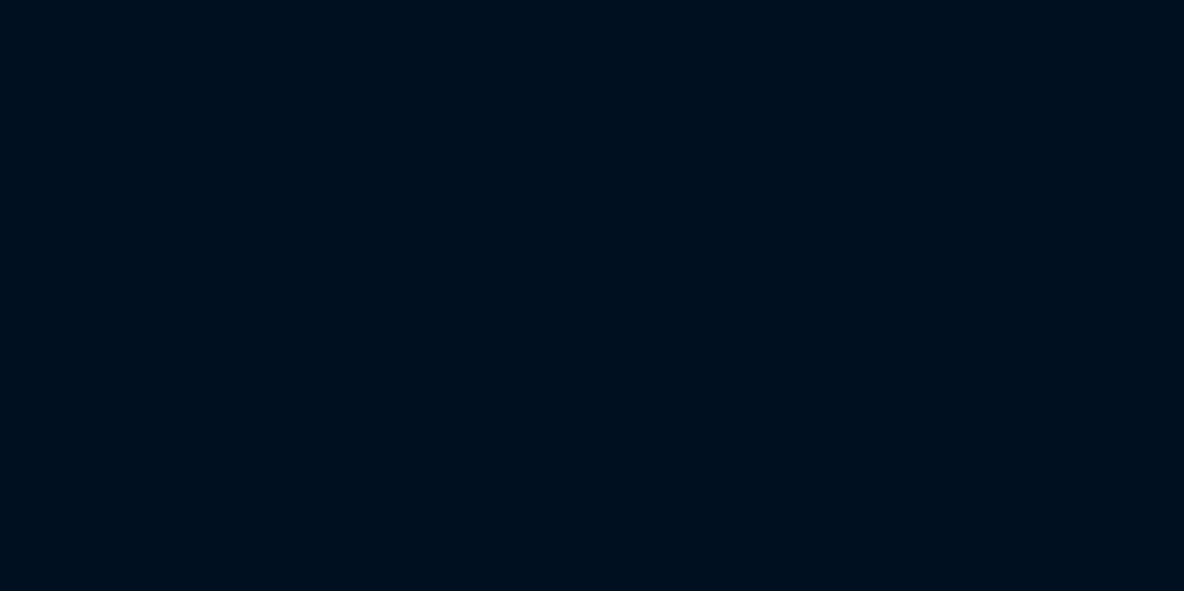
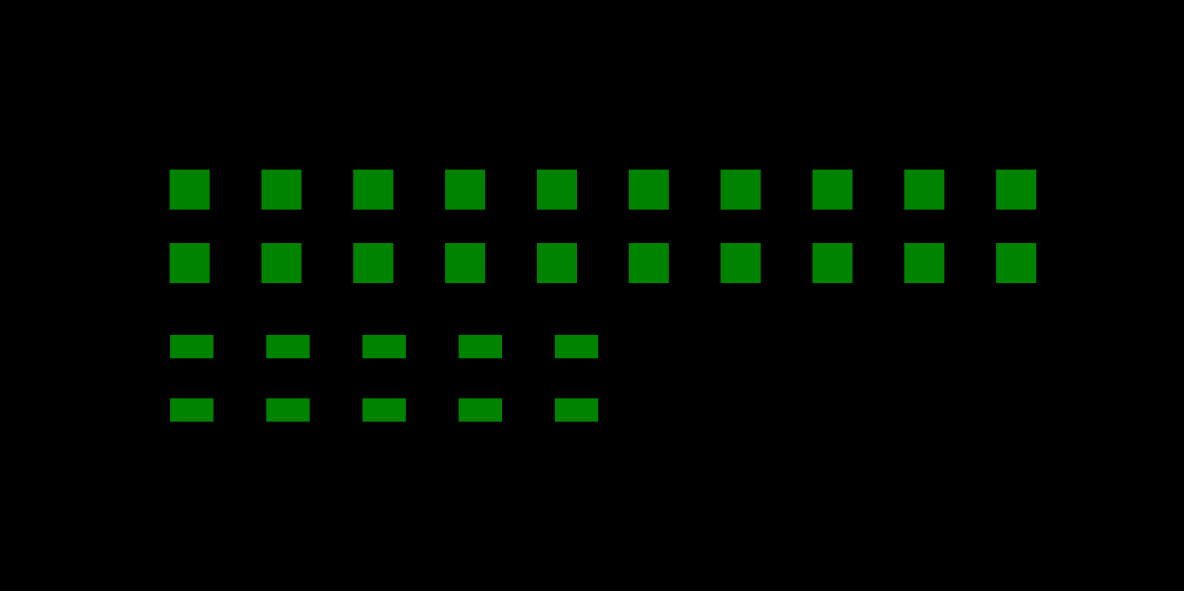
part: none -> (189, 226)
part: none -> (281, 226)
part: none -> (373, 226)
part: none -> (465, 226)
part: none -> (556, 226)
part: none -> (648, 226)
part: none -> (740, 226)
part: none -> (832, 226)
part: none -> (924, 226)
part: none -> (1016, 226)
part: none -> (191, 378)
part: none -> (287, 378)
part: none -> (384, 378)
part: none -> (480, 378)
part: none -> (576, 378)

